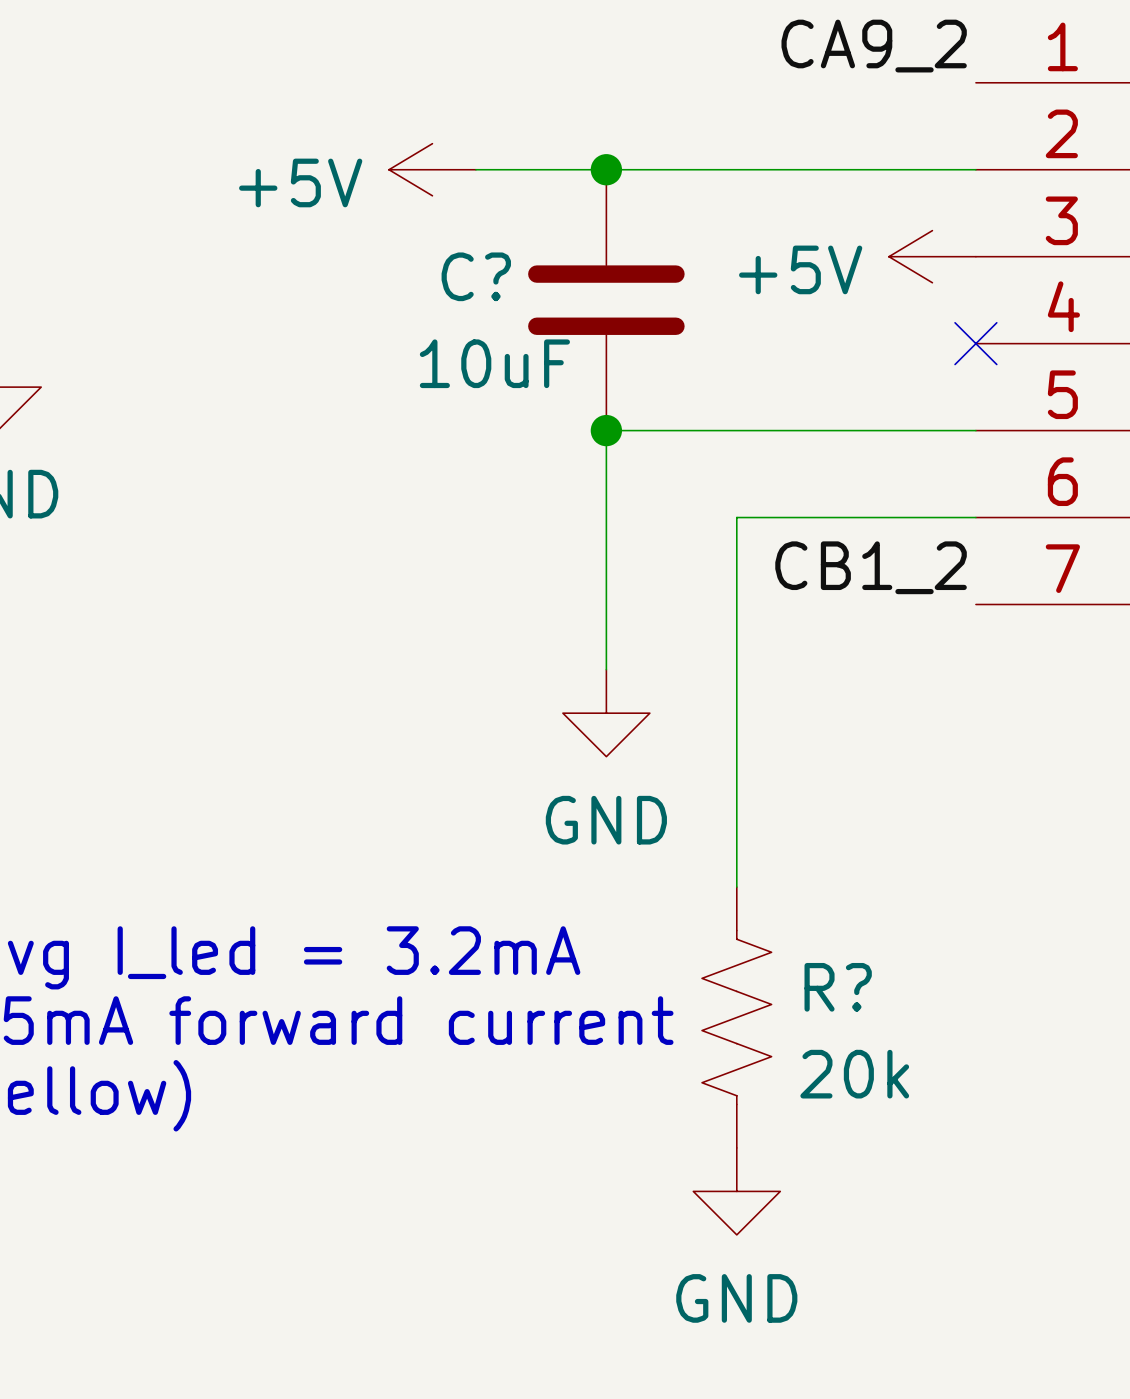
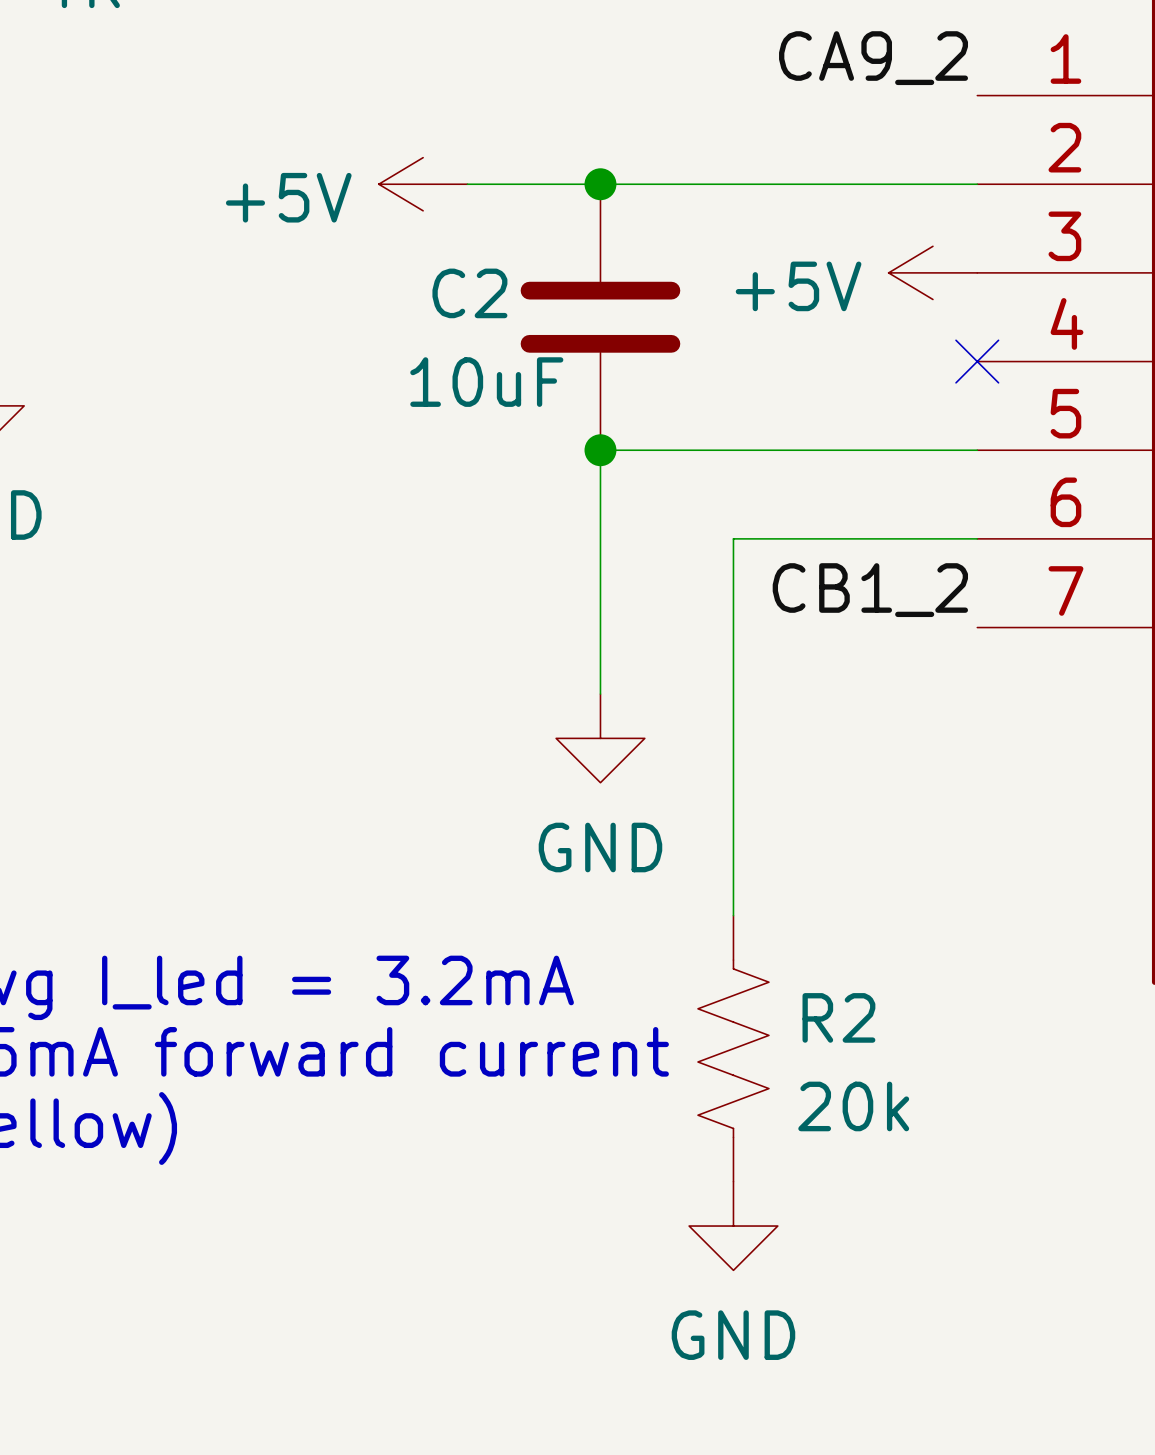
C? name: C? (476, 276) -> C2 (469, 293)
R? name: R? (838, 987) -> R2 (838, 1017)

